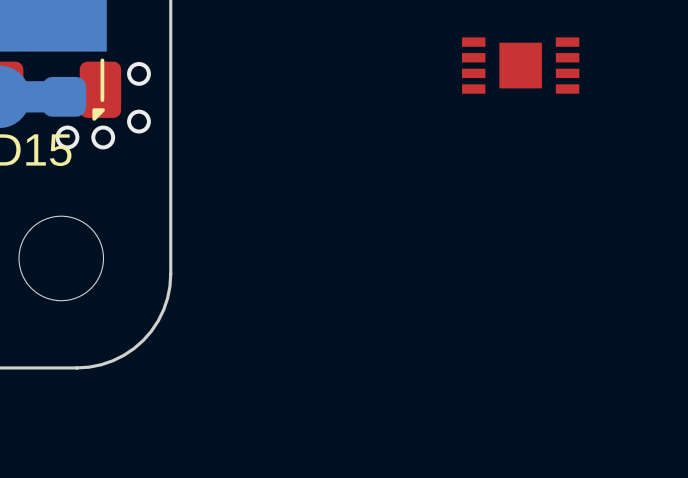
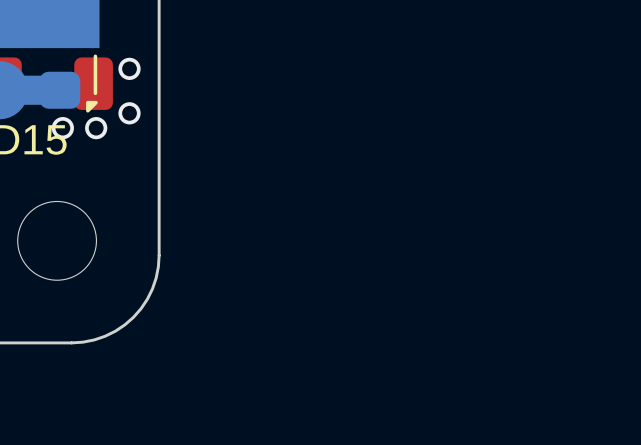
part: (520, 65) -> none

